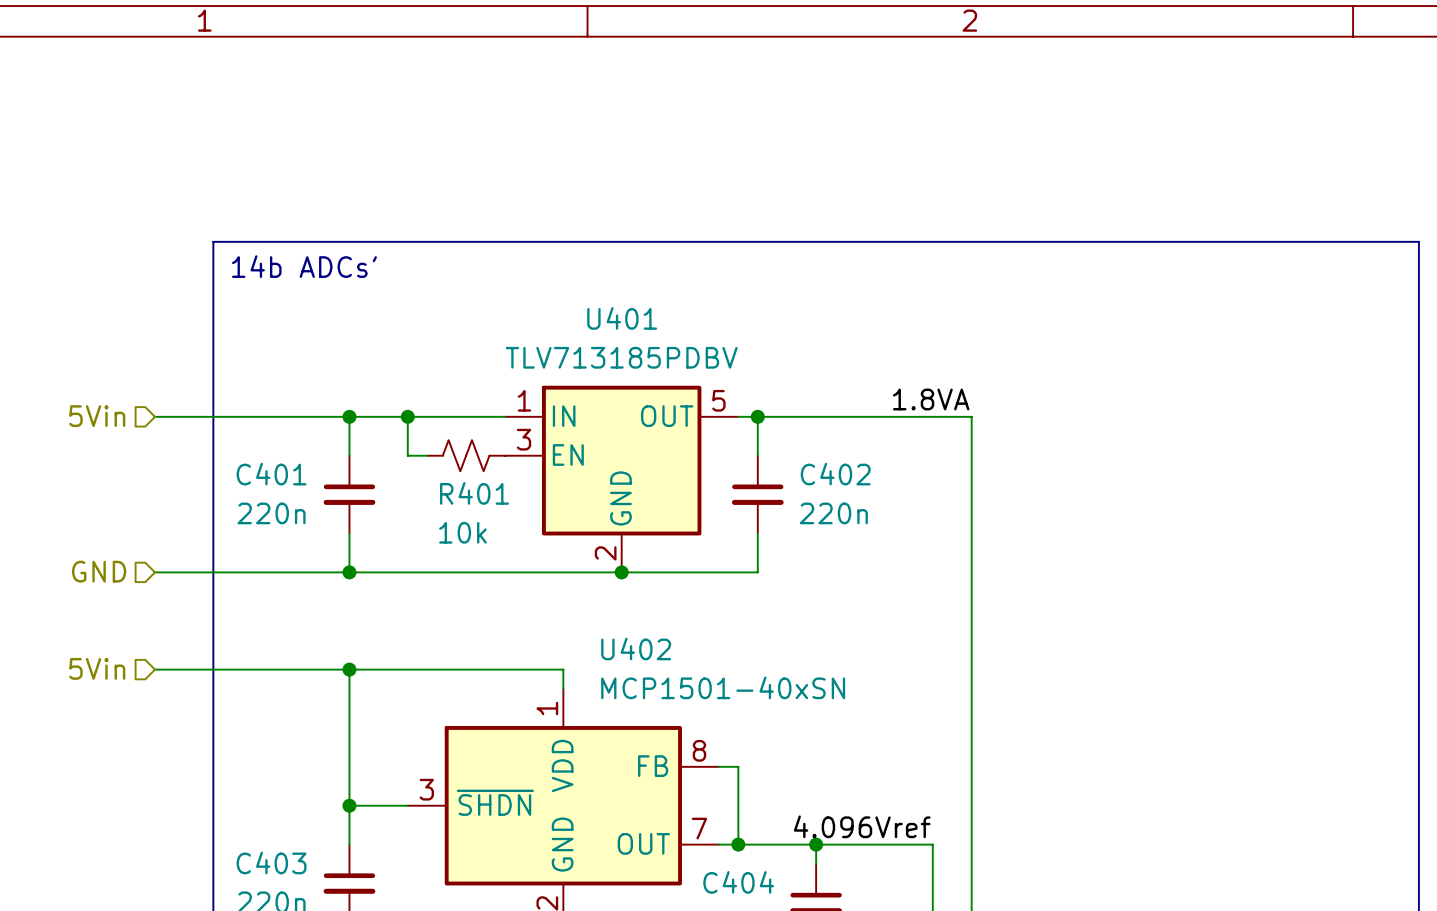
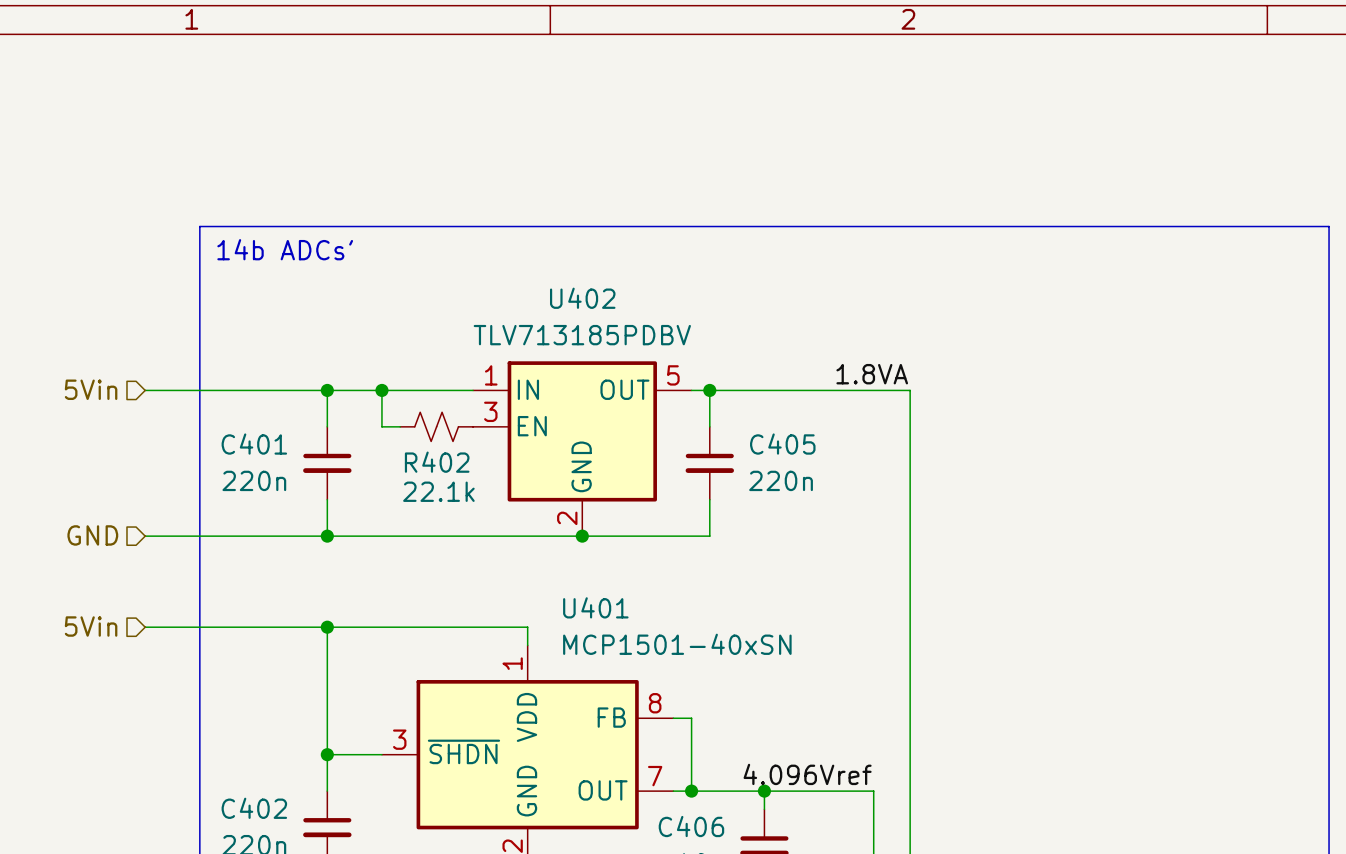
U401 name: U401 (622, 318) -> U402 (582, 298)
C402 name: C402 (835, 474) -> C405 (782, 444)
R401 name: R401 (474, 493) -> R402 (437, 462)
R401 value: 10k (462, 532) -> 22.1k (438, 491)
U402 name: U402 (636, 648) -> U401 (595, 607)
C403 name: C403 (271, 862) -> C402 (254, 808)
C404 name: C404 (738, 882) -> C406 (691, 826)

